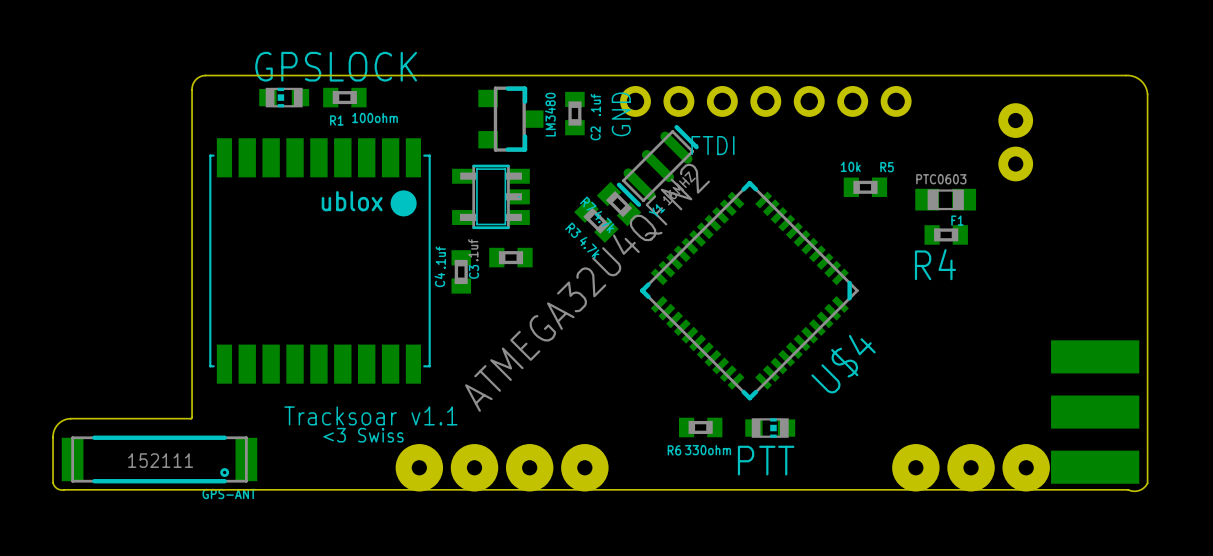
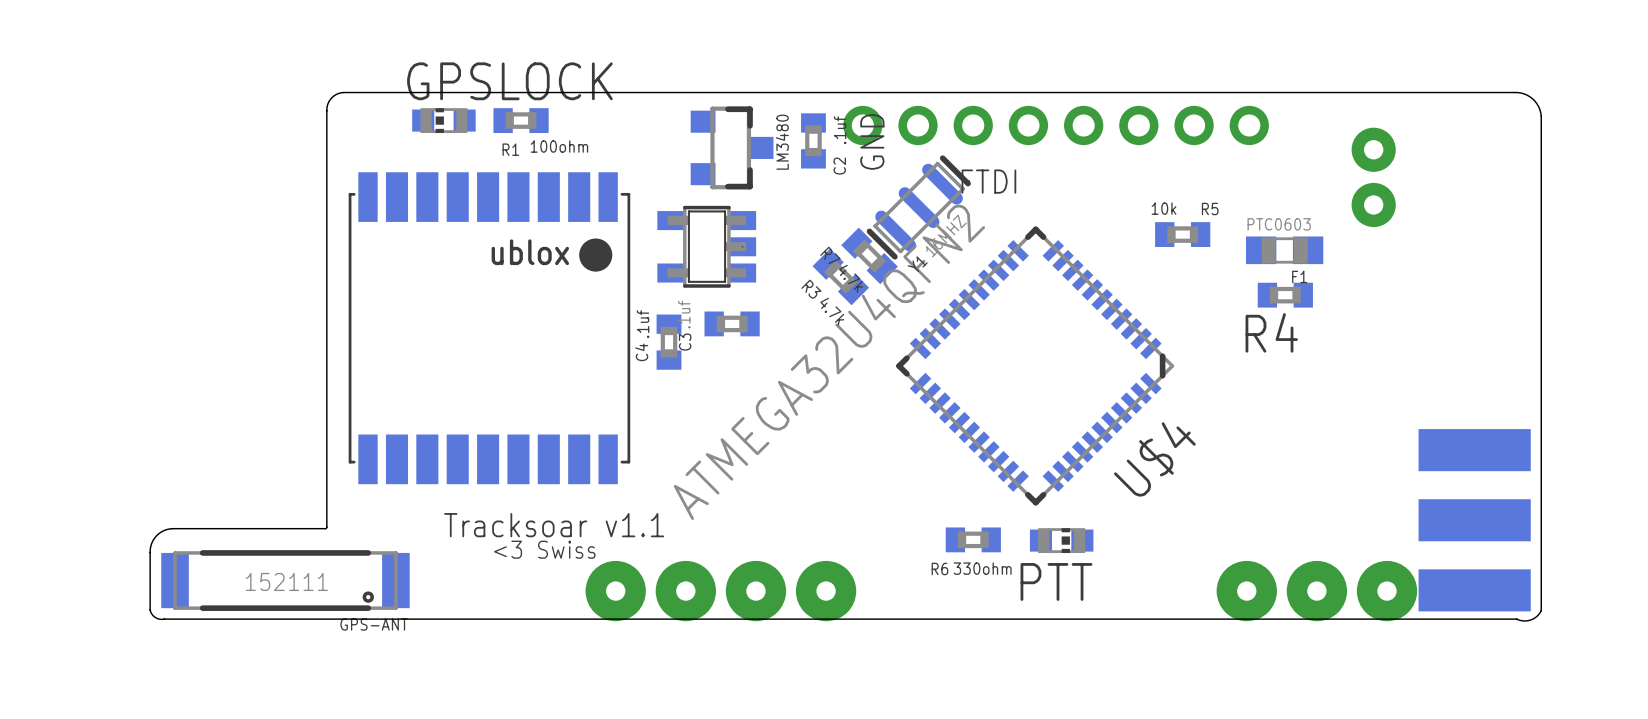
part footprint: [620, 86, 912, 117] -> [843, 105, 1269, 146]

